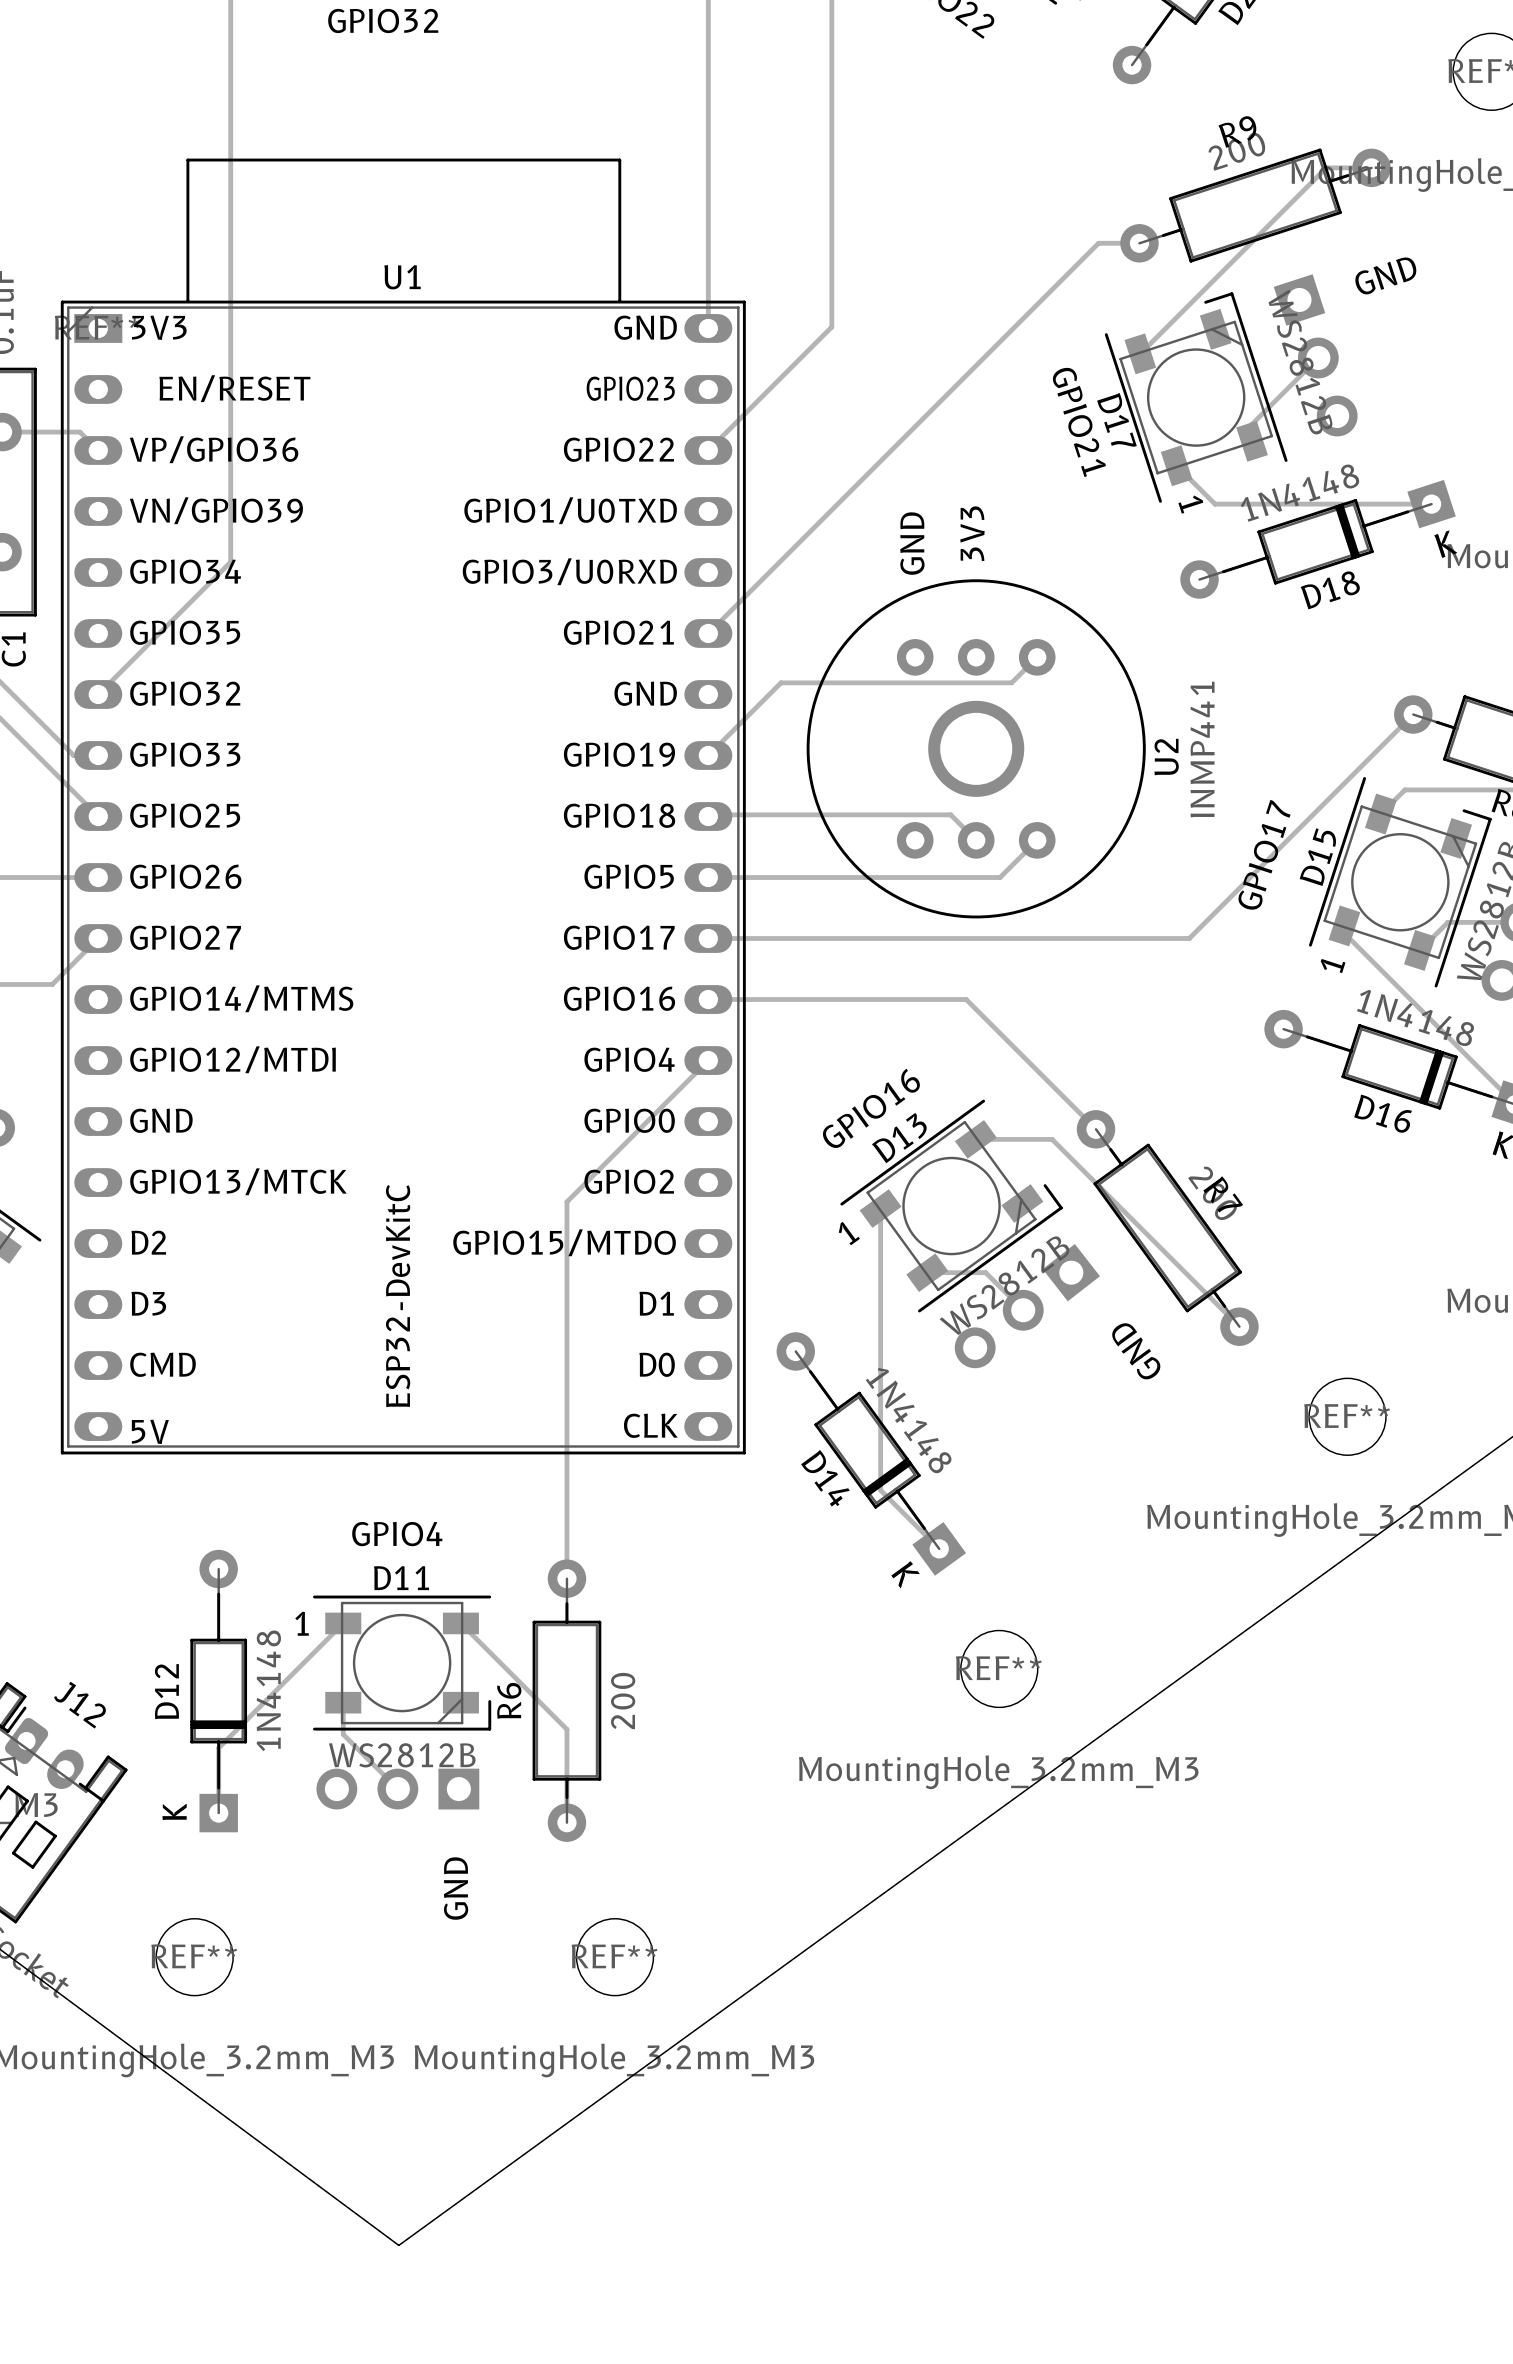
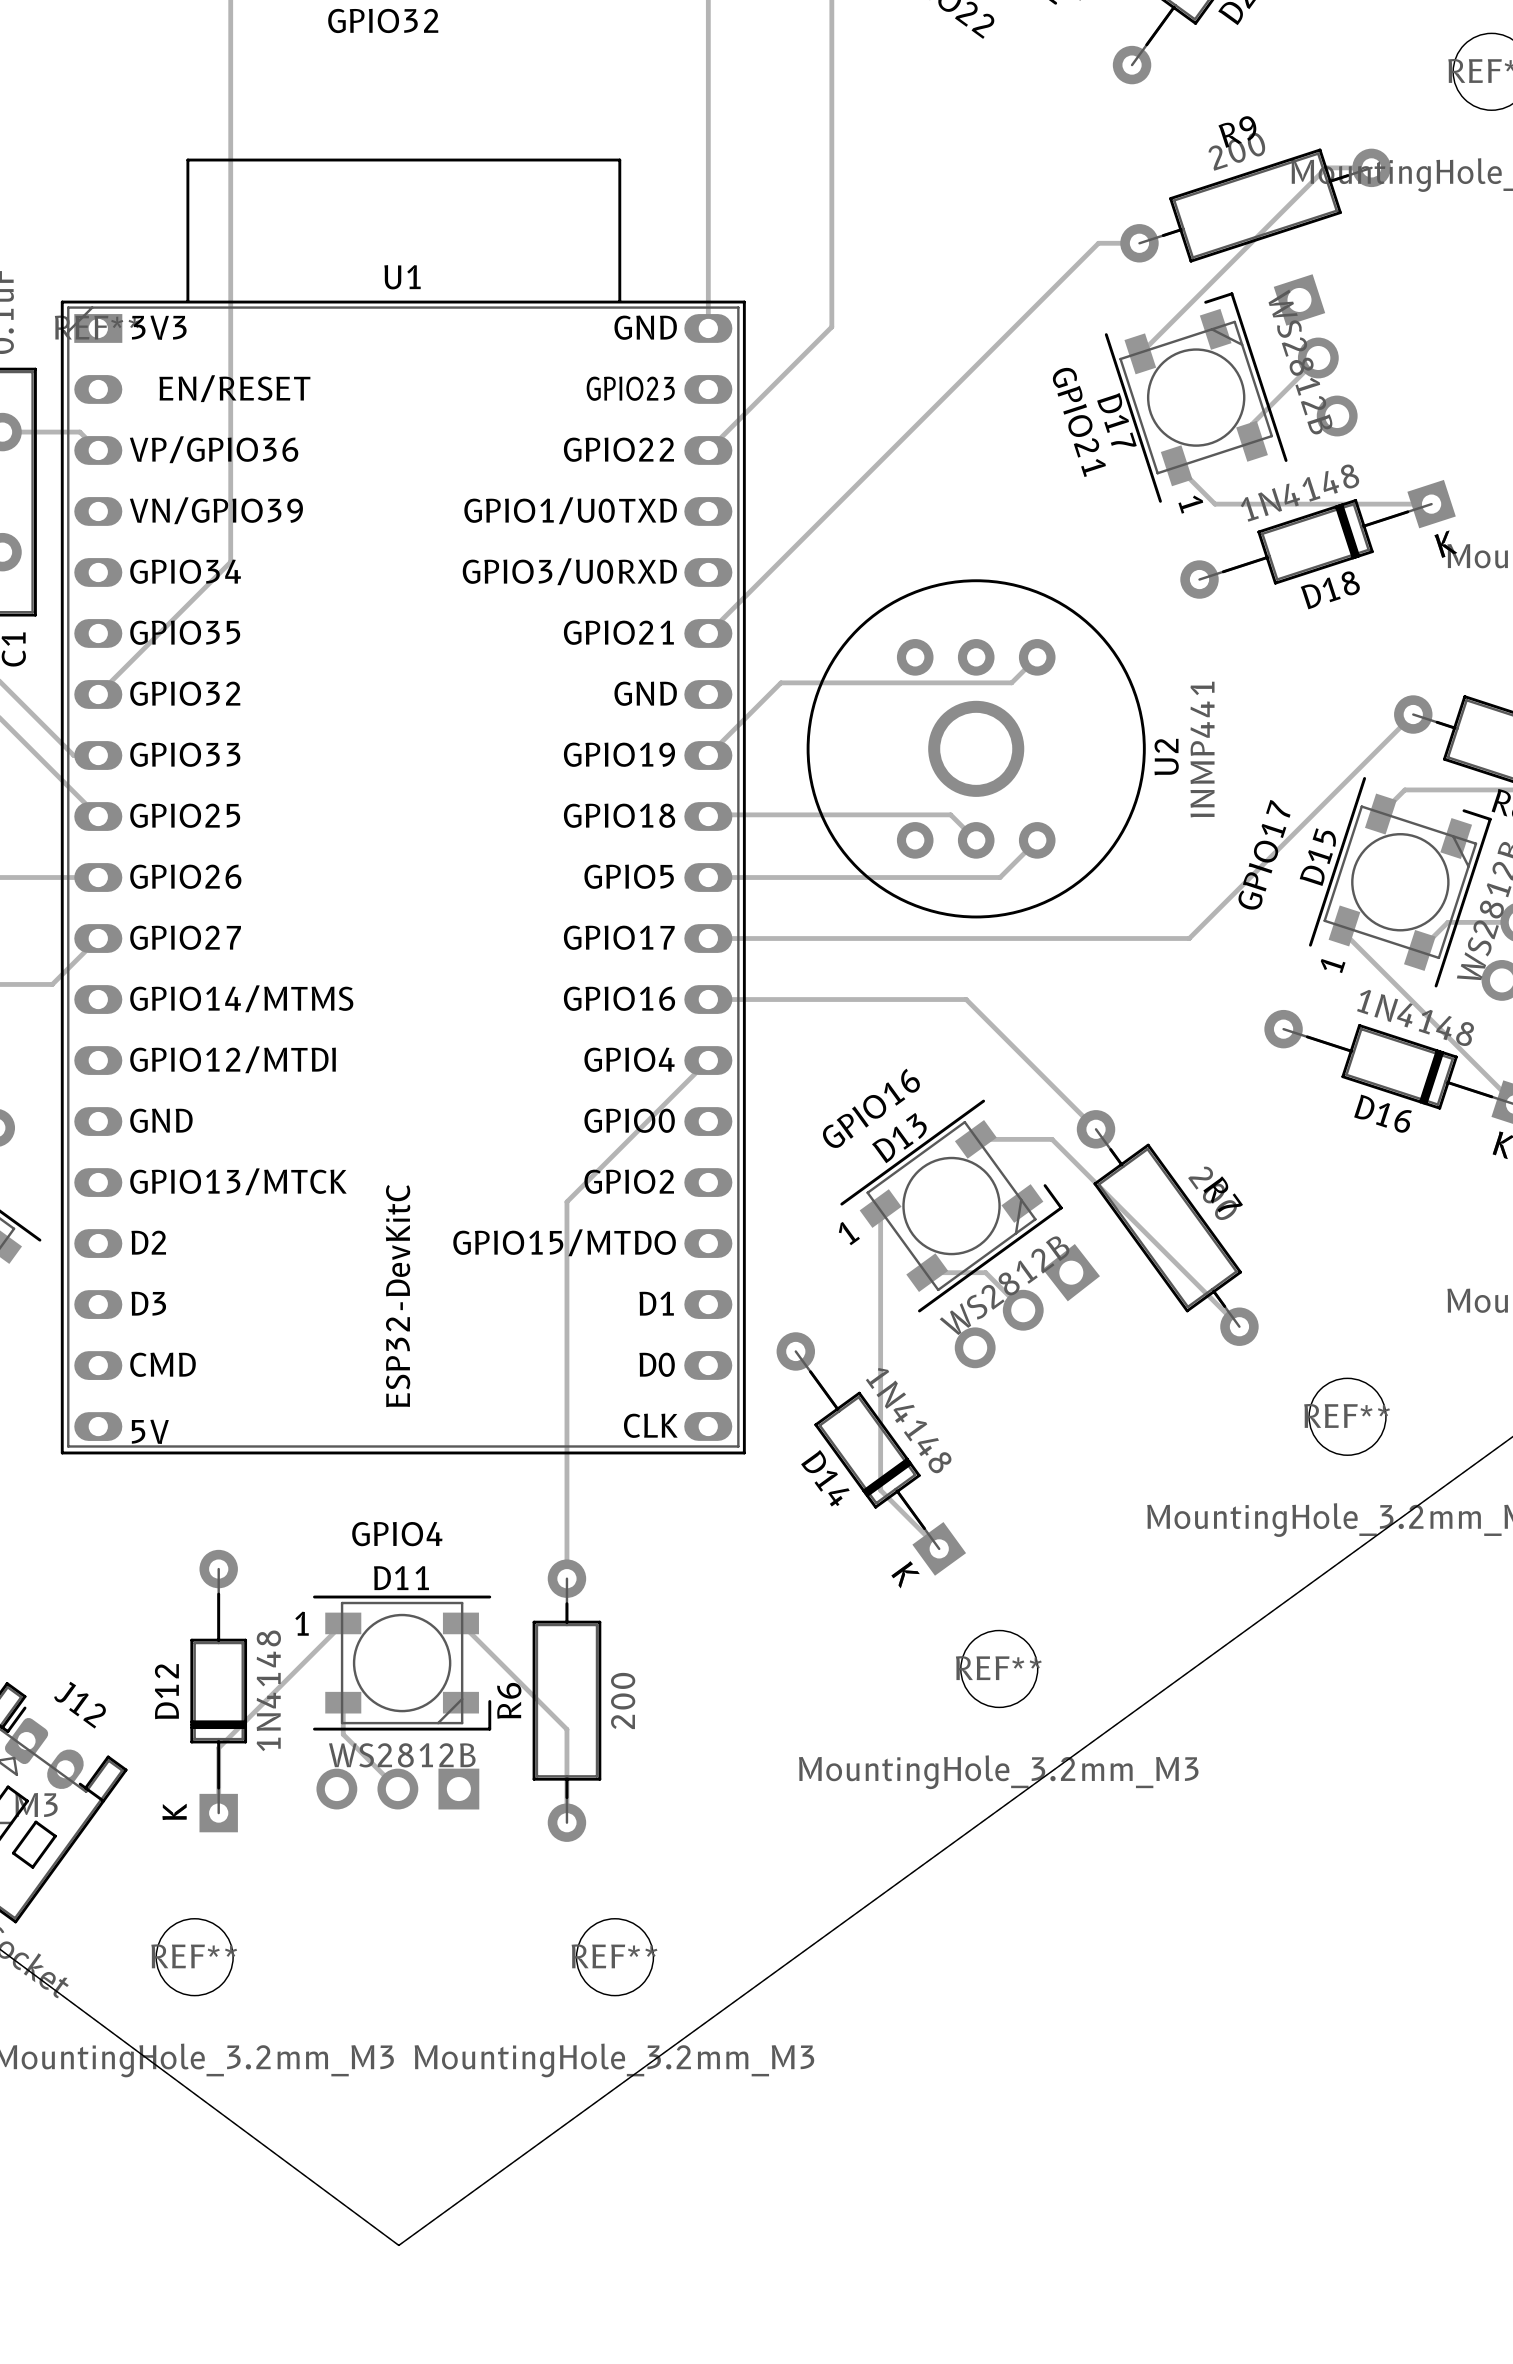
text: GND (1385, 276) -> none
text: 3V3 (972, 533) -> none
text: GND (912, 543) -> none
text: GND (1136, 1351) -> none
text: GND (456, 1888) -> none

